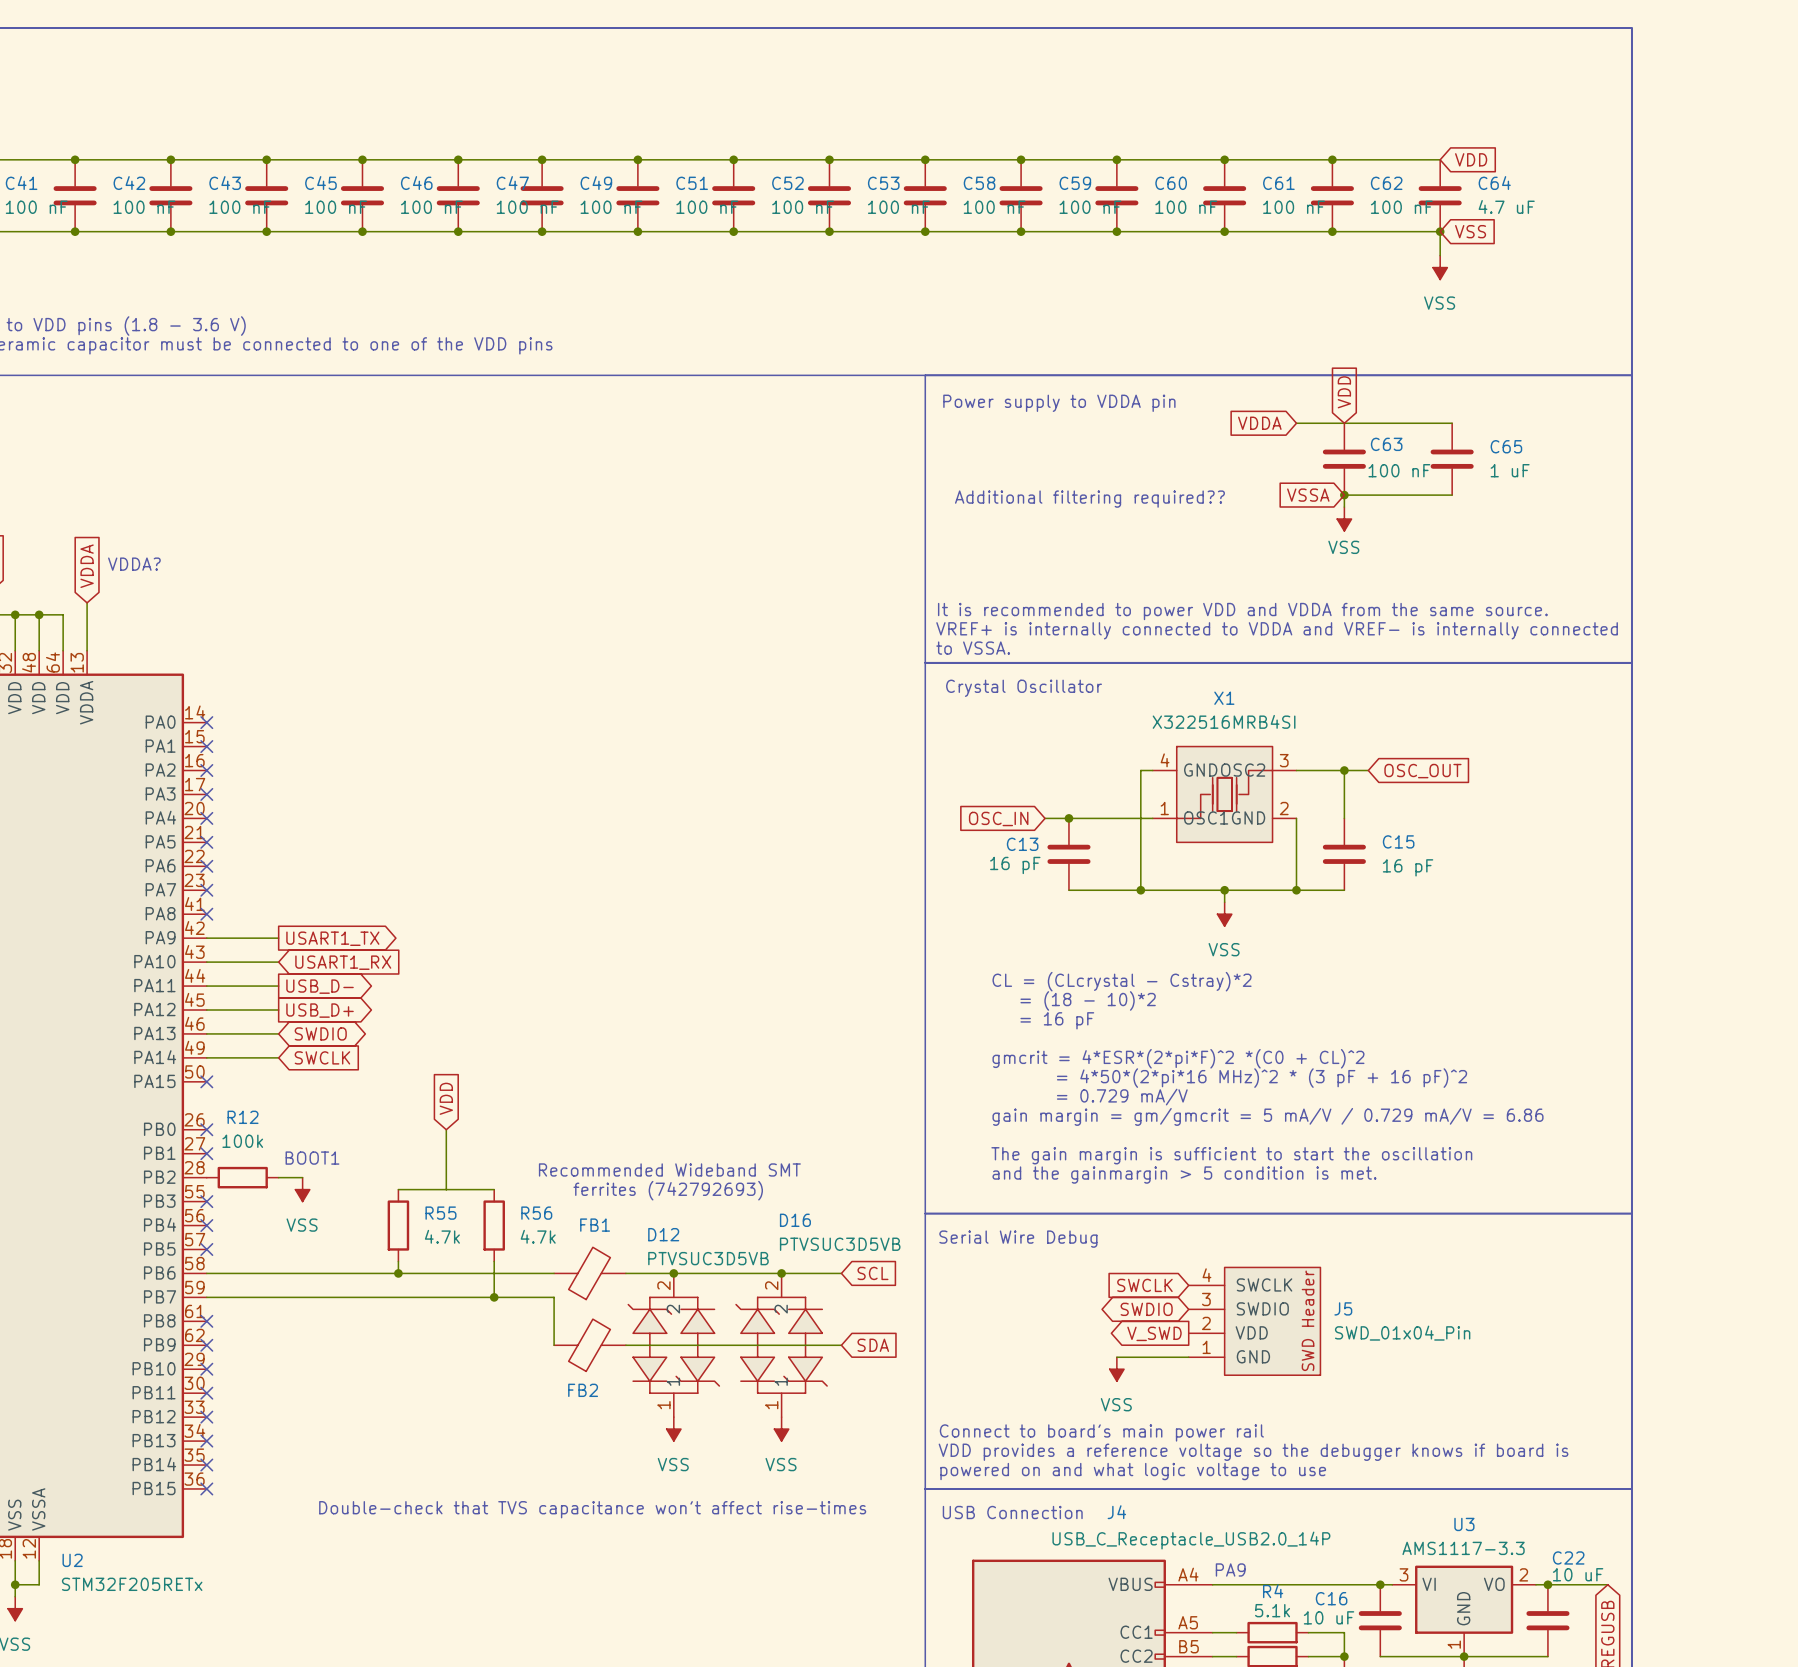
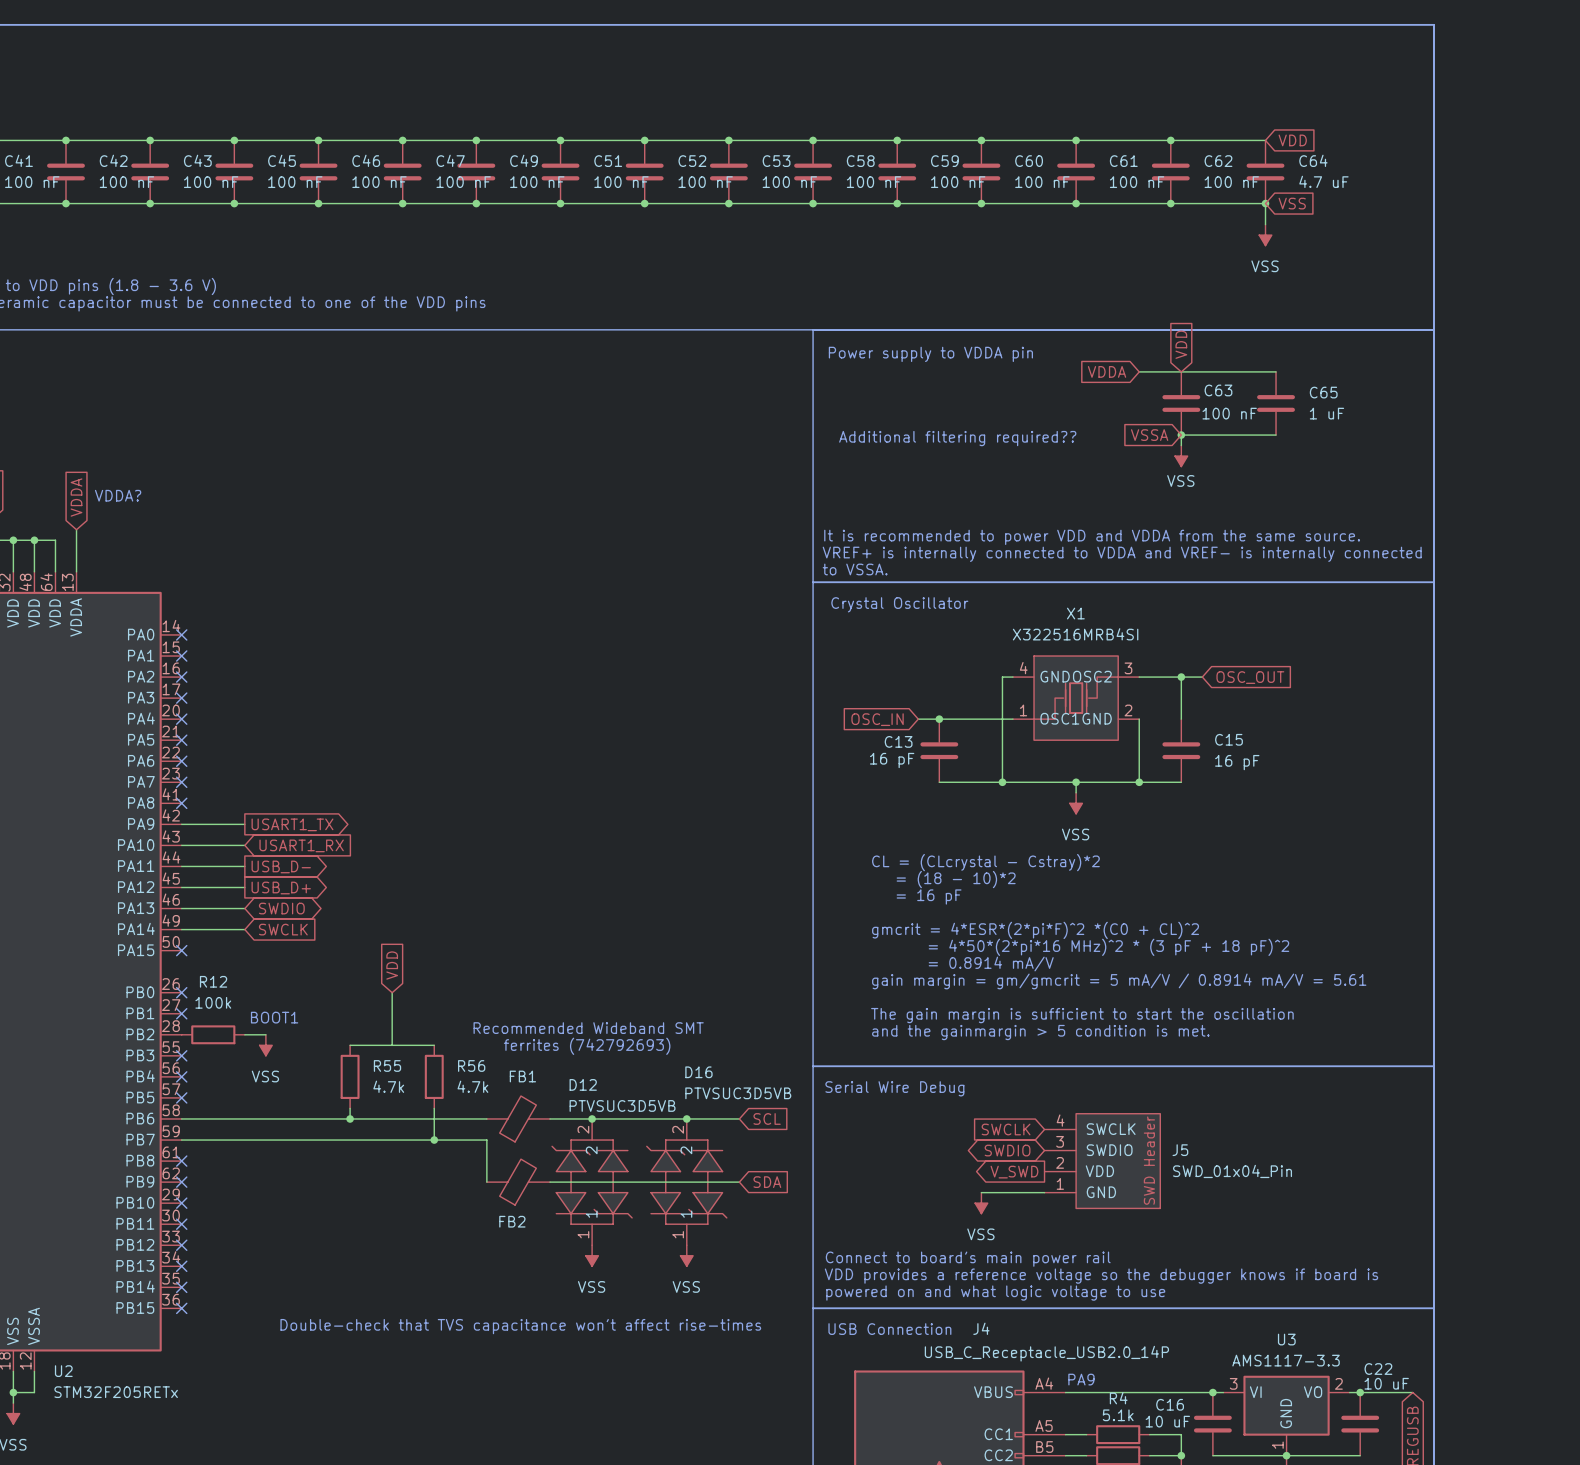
text: = 4*50*(2*pi*16 MHz)^2 * (3 pF + 16 pF)^2 (1262, 1078) -> = 4*50*(2*pi*16 MHz)^2 * (3 pF + 18 pF)^2 (1108, 947)
text: = 0.729 mA/V (1122, 1097) -> = 0.8914 mA/V (991, 964)
text: gain margin = gm/gmcrit = 5 mA/V / 0.729 mA/V = 6.86 (1268, 1116) -> gain margin = gm/gmcrit = 5 mA/V / 0.8914 mA/V = 5.61 (1119, 981)

